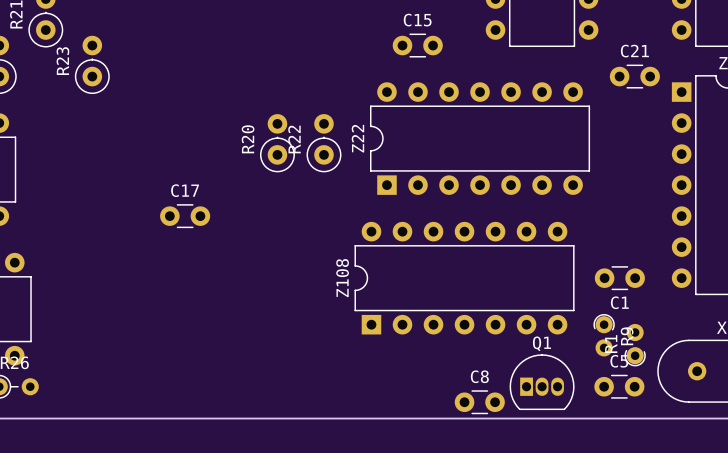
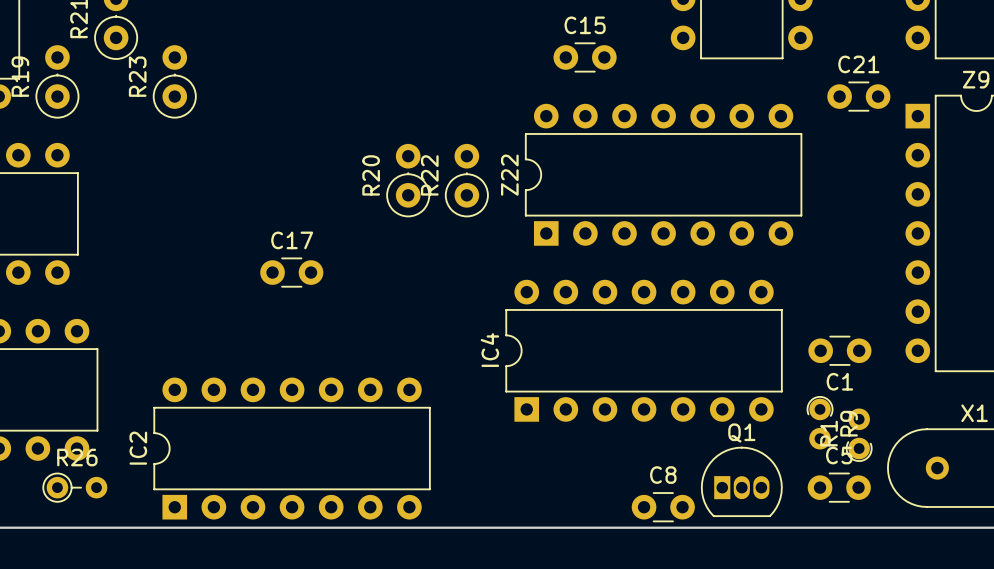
Z108 name: Z108 (342, 278) -> IC4 (489, 350)
IC2: none -> (292, 448)

